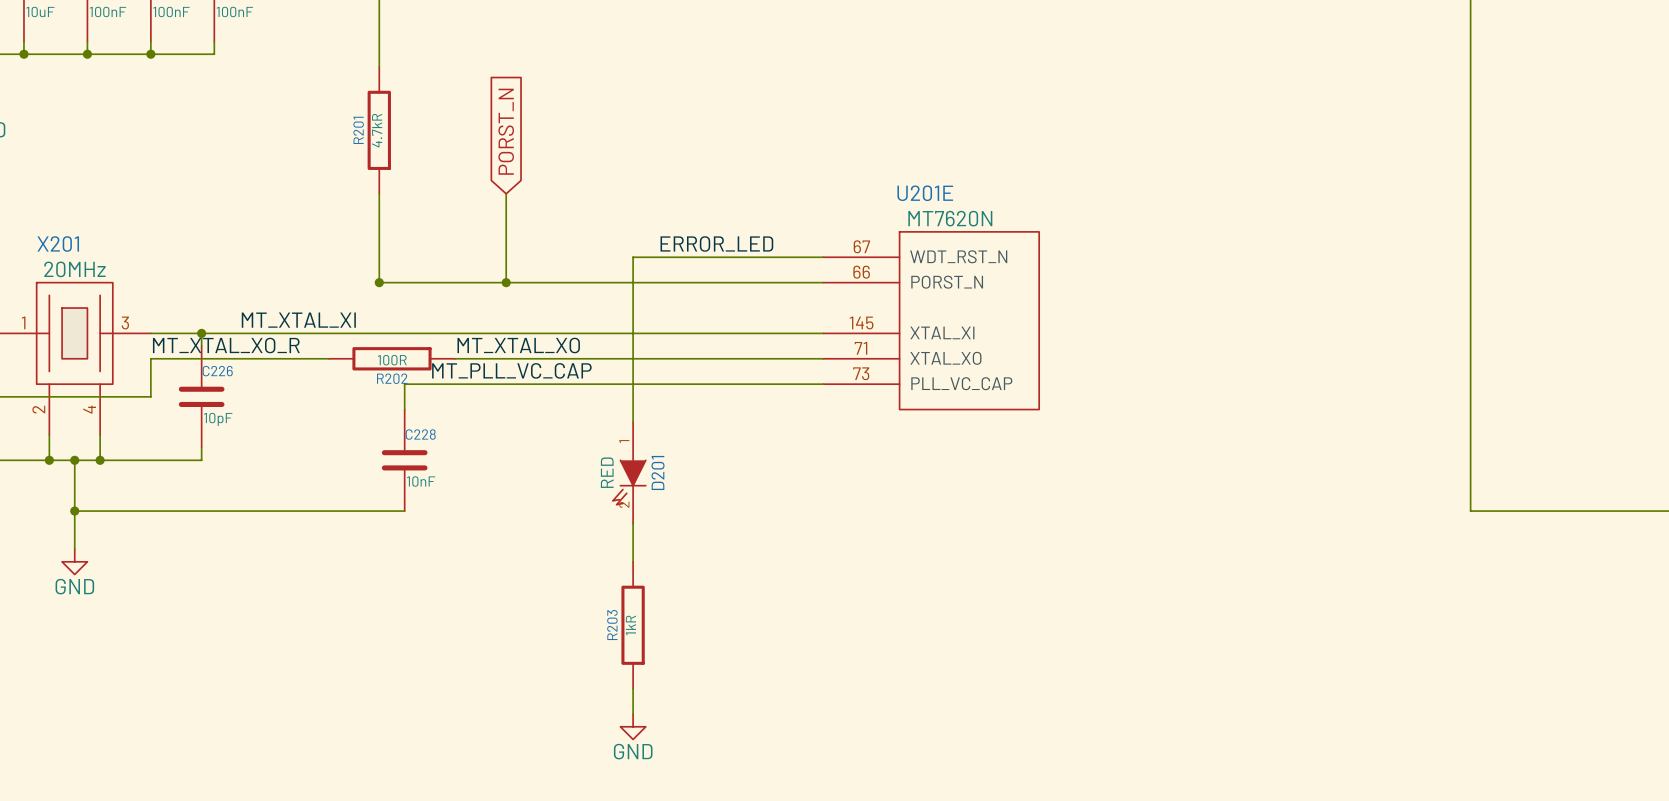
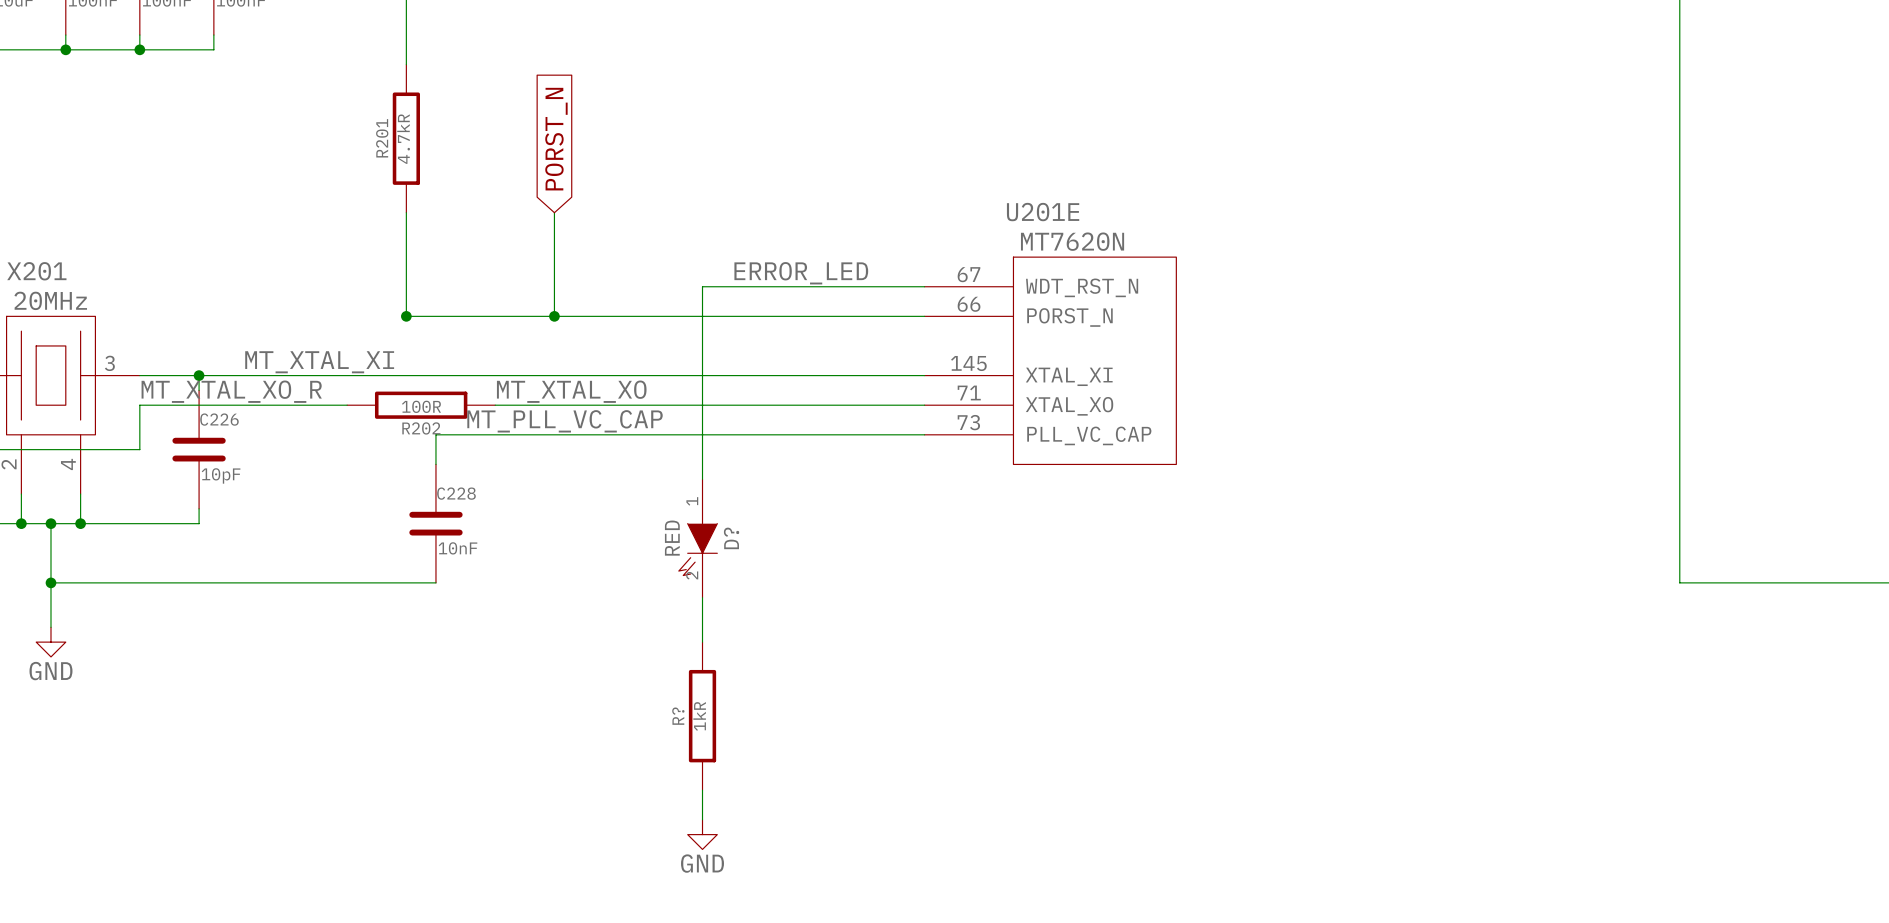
D201 name: D201 (658, 472) -> D? (731, 538)
R203 name: R203 (612, 625) -> R? (678, 716)

